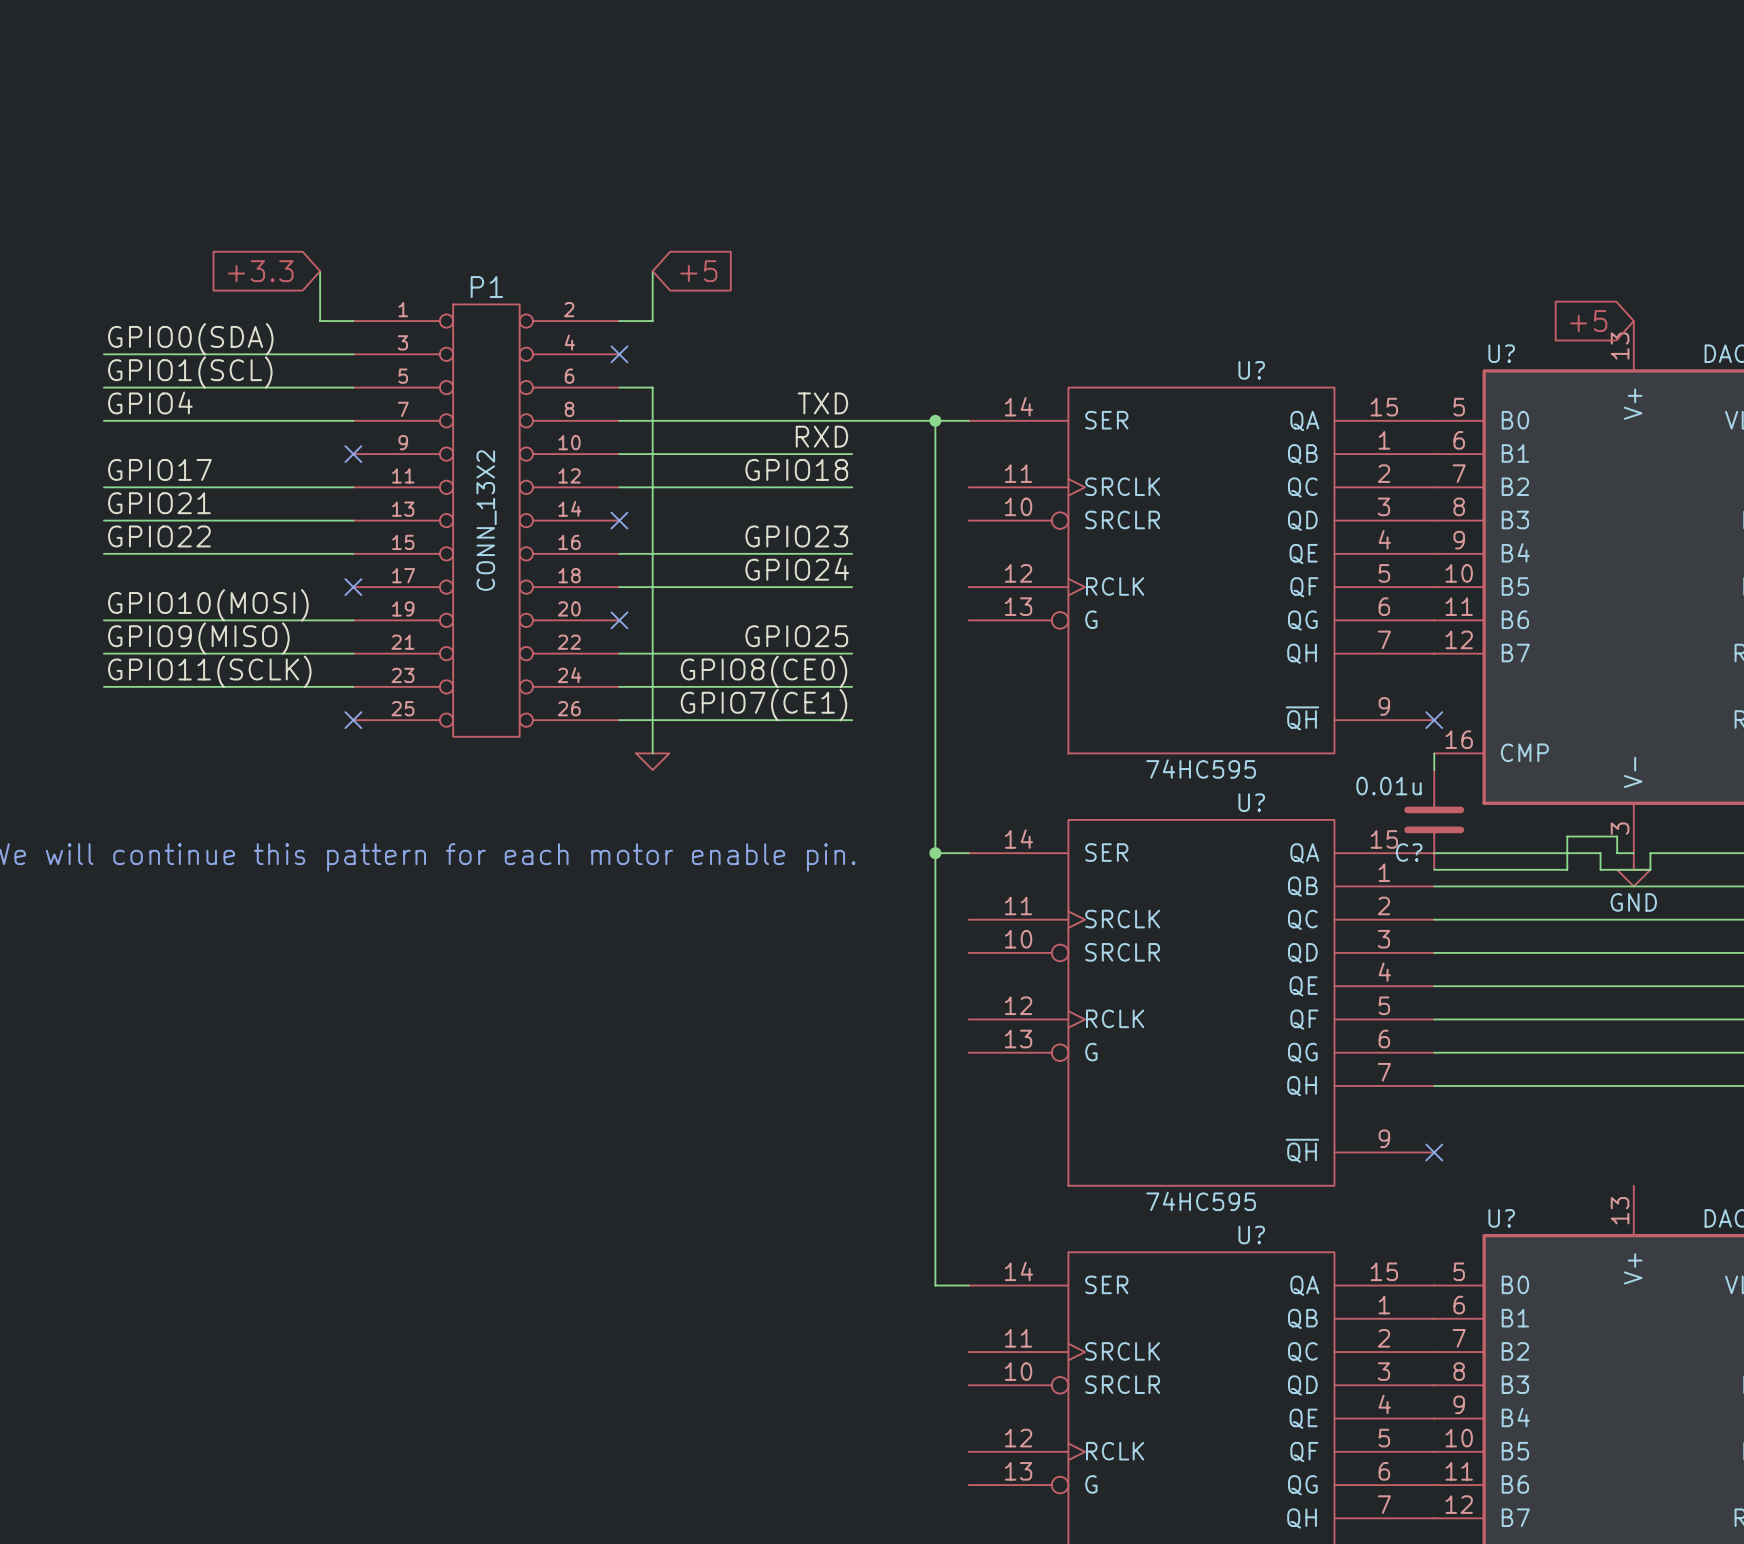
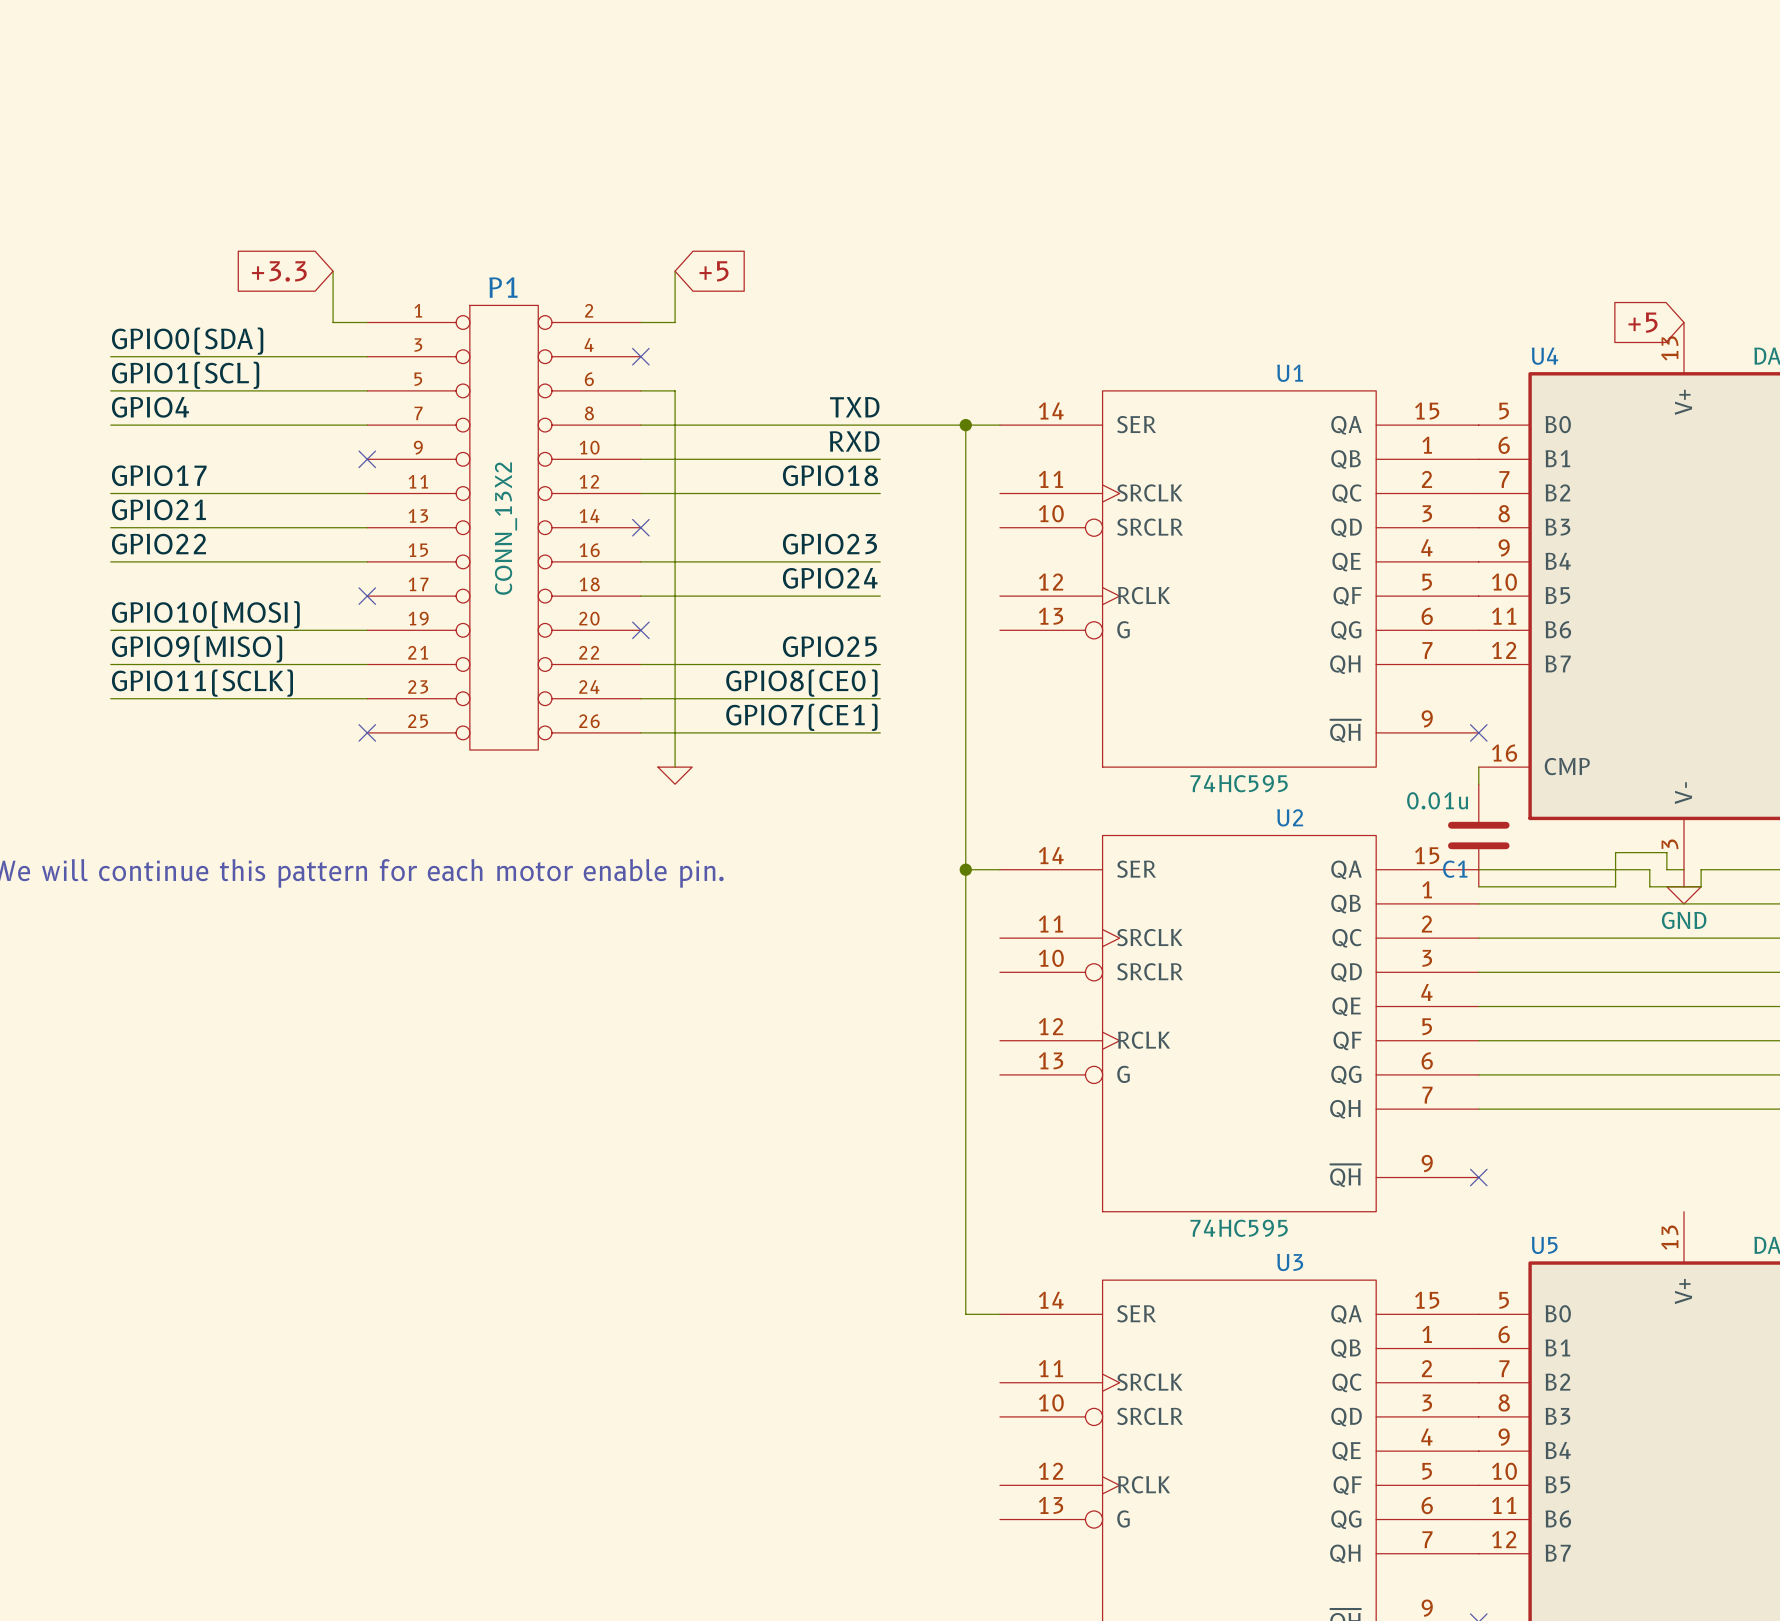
U? name: U? (1501, 353) -> U4 (1544, 356)
U? name: U? (1251, 370) -> U1 (1290, 373)
U? name: U? (1251, 802) -> U2 (1290, 817)
C? name: C? (1409, 852) -> C1 (1455, 869)
U? name: U? (1501, 1218) -> U5 (1544, 1245)
U? name: U? (1251, 1235) -> U3 (1290, 1262)

